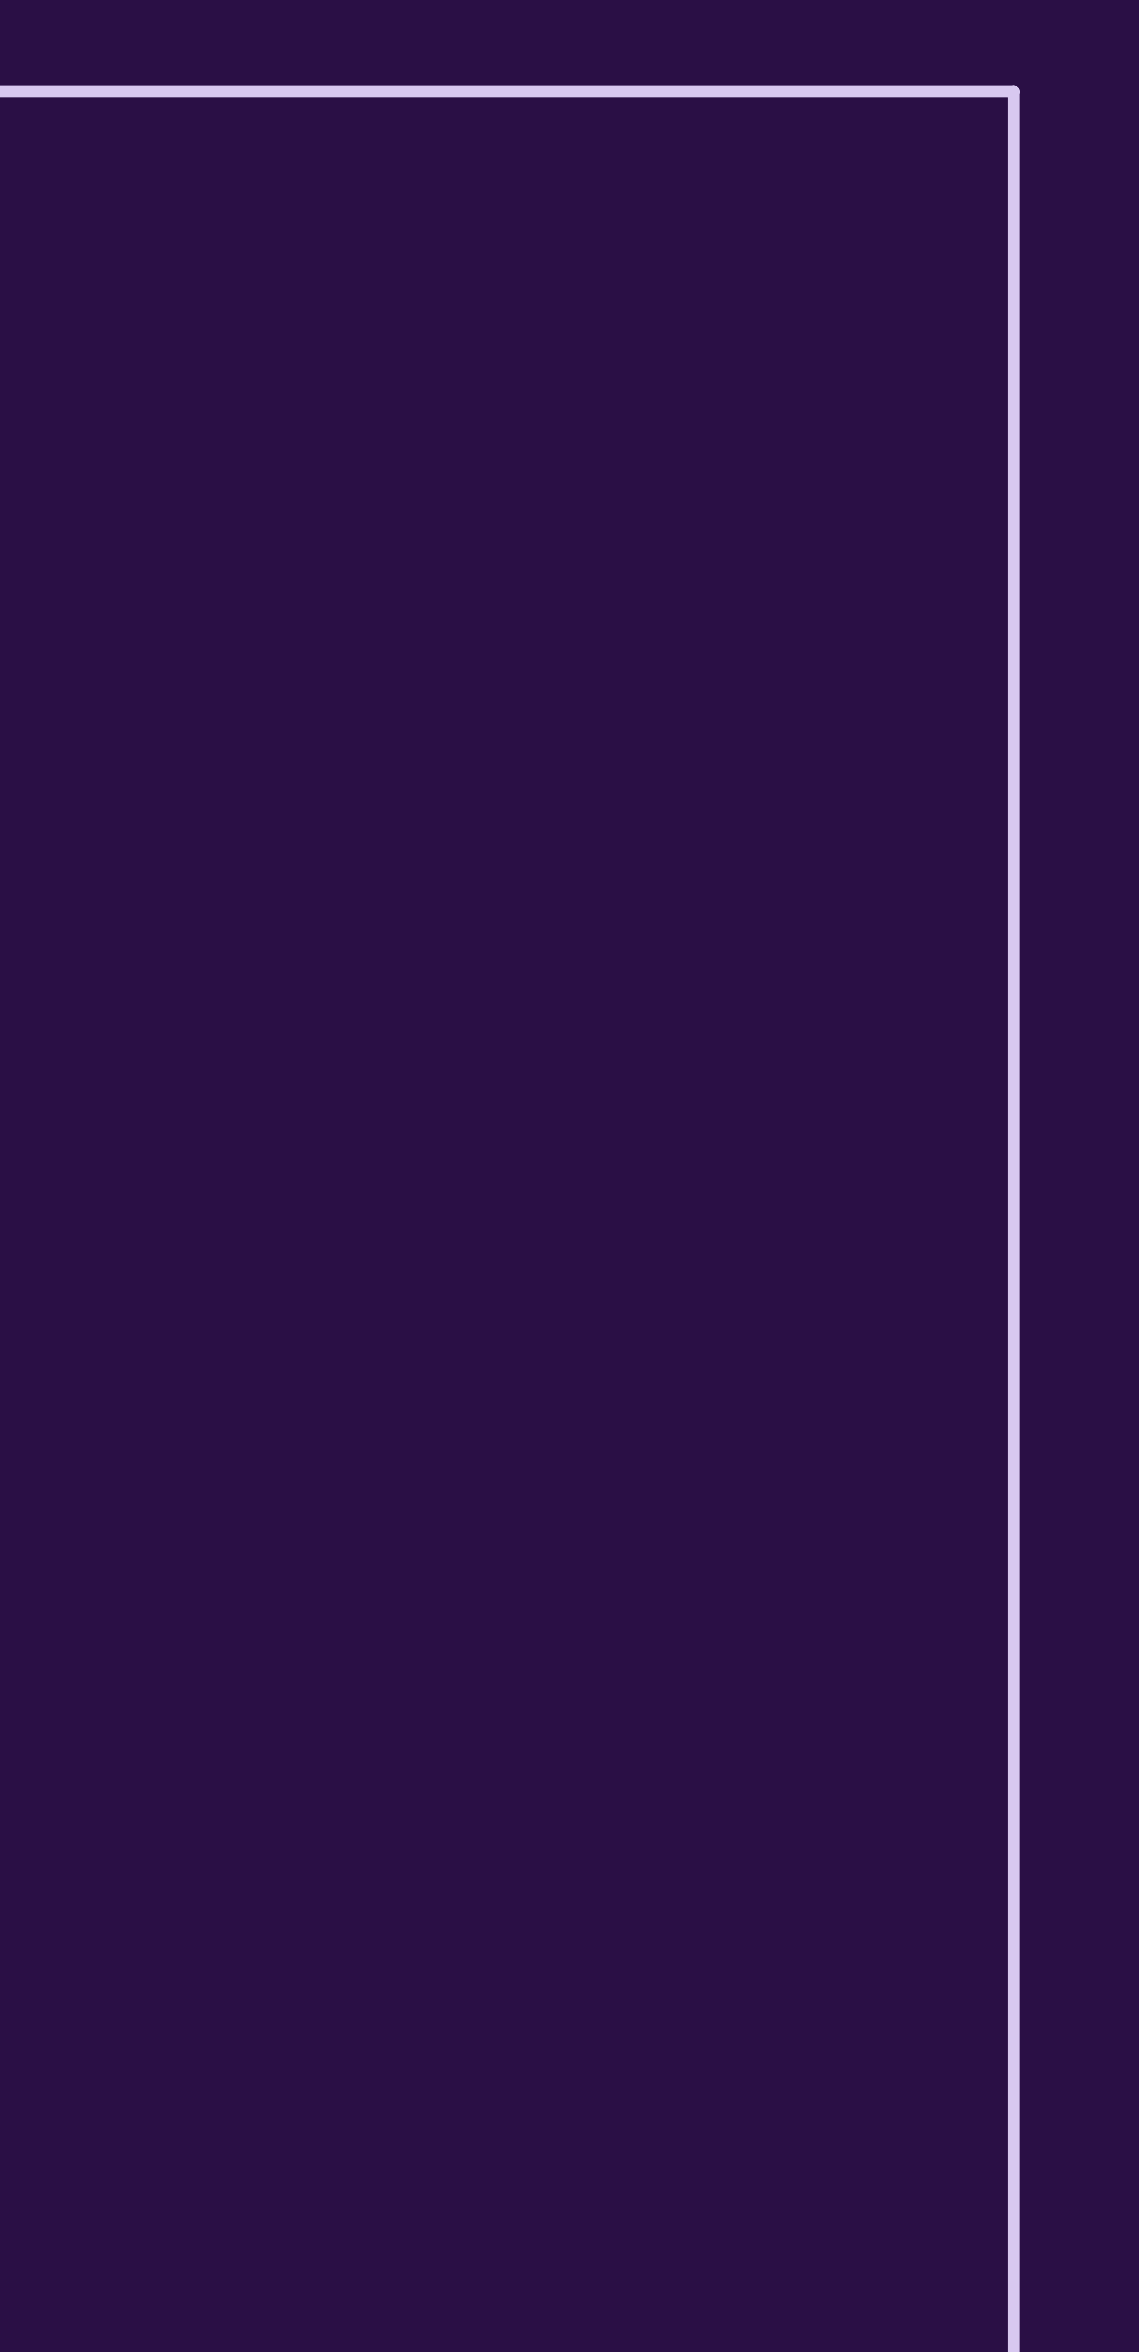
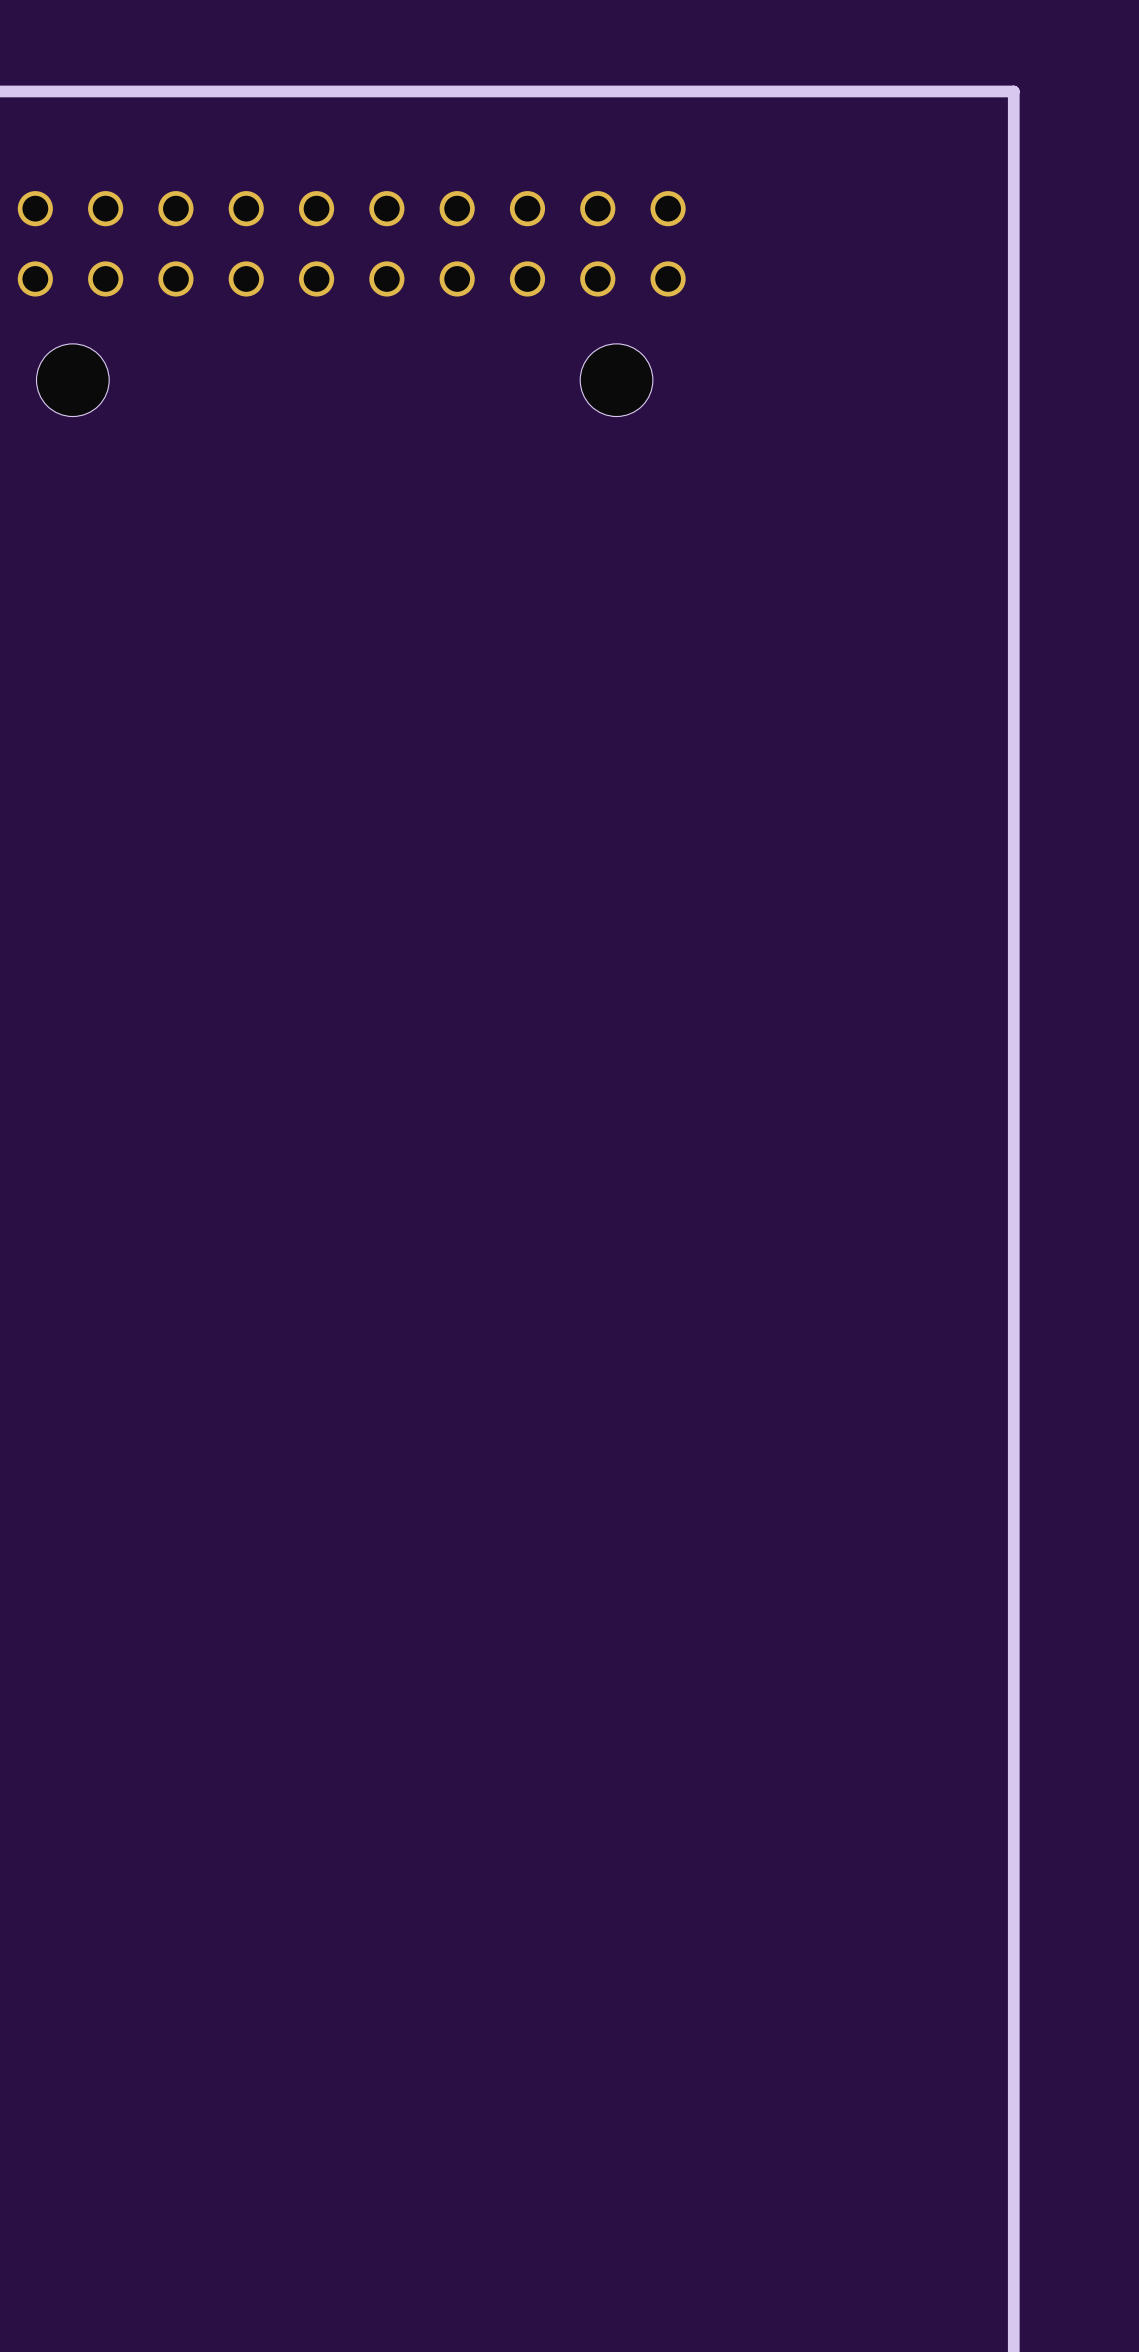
part: none -> (351, 303)

